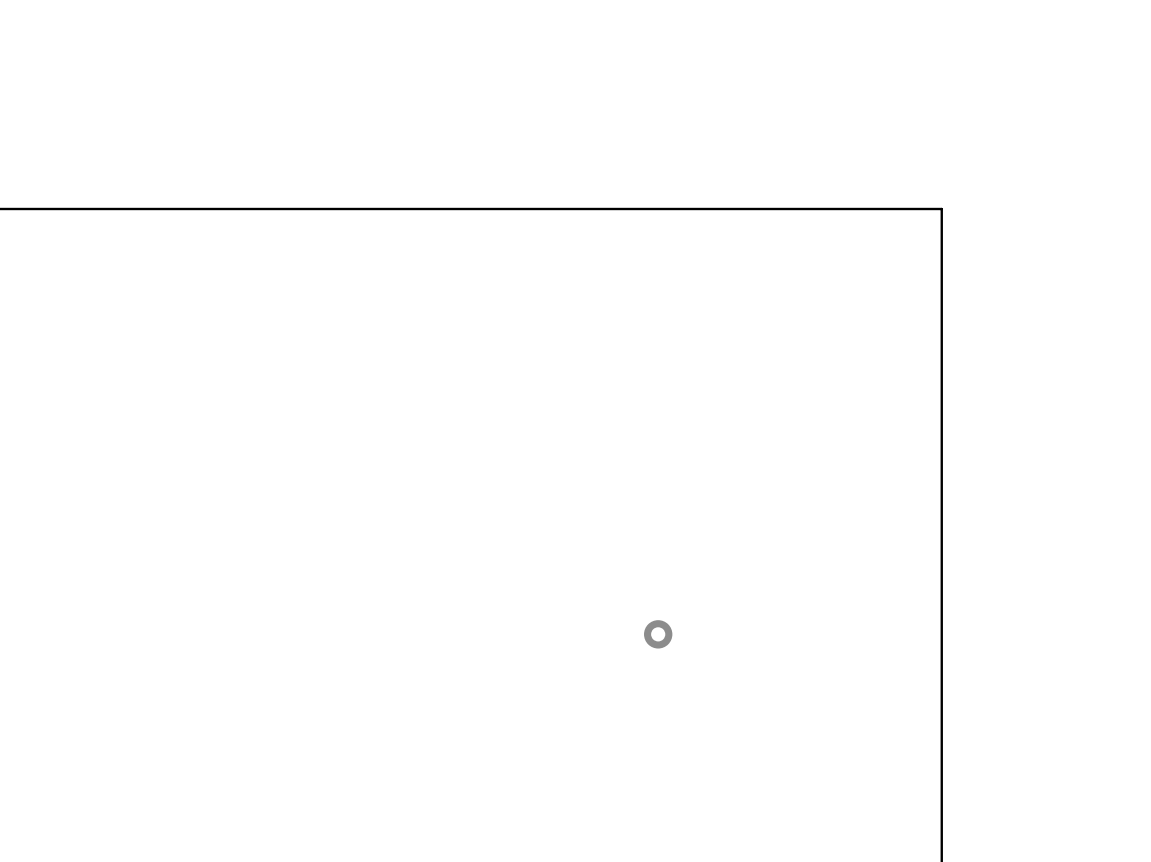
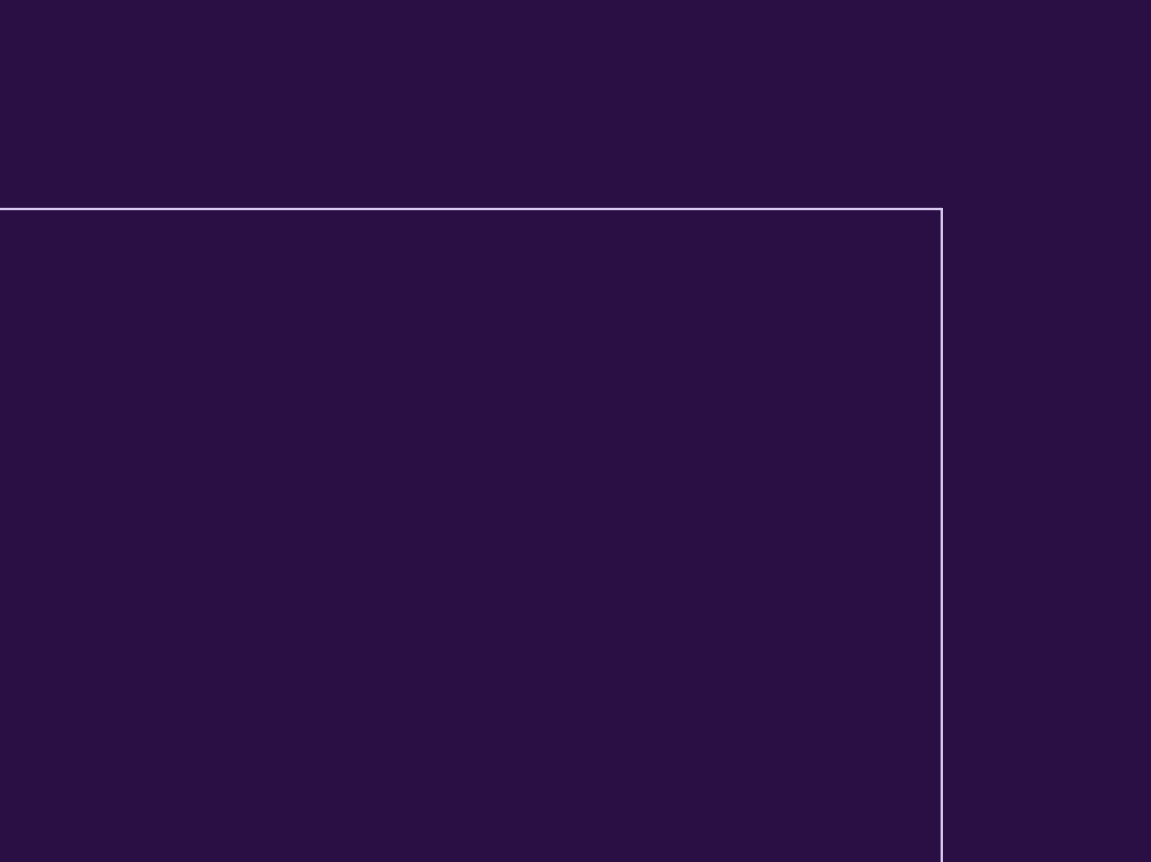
via: (658, 634) -> none

